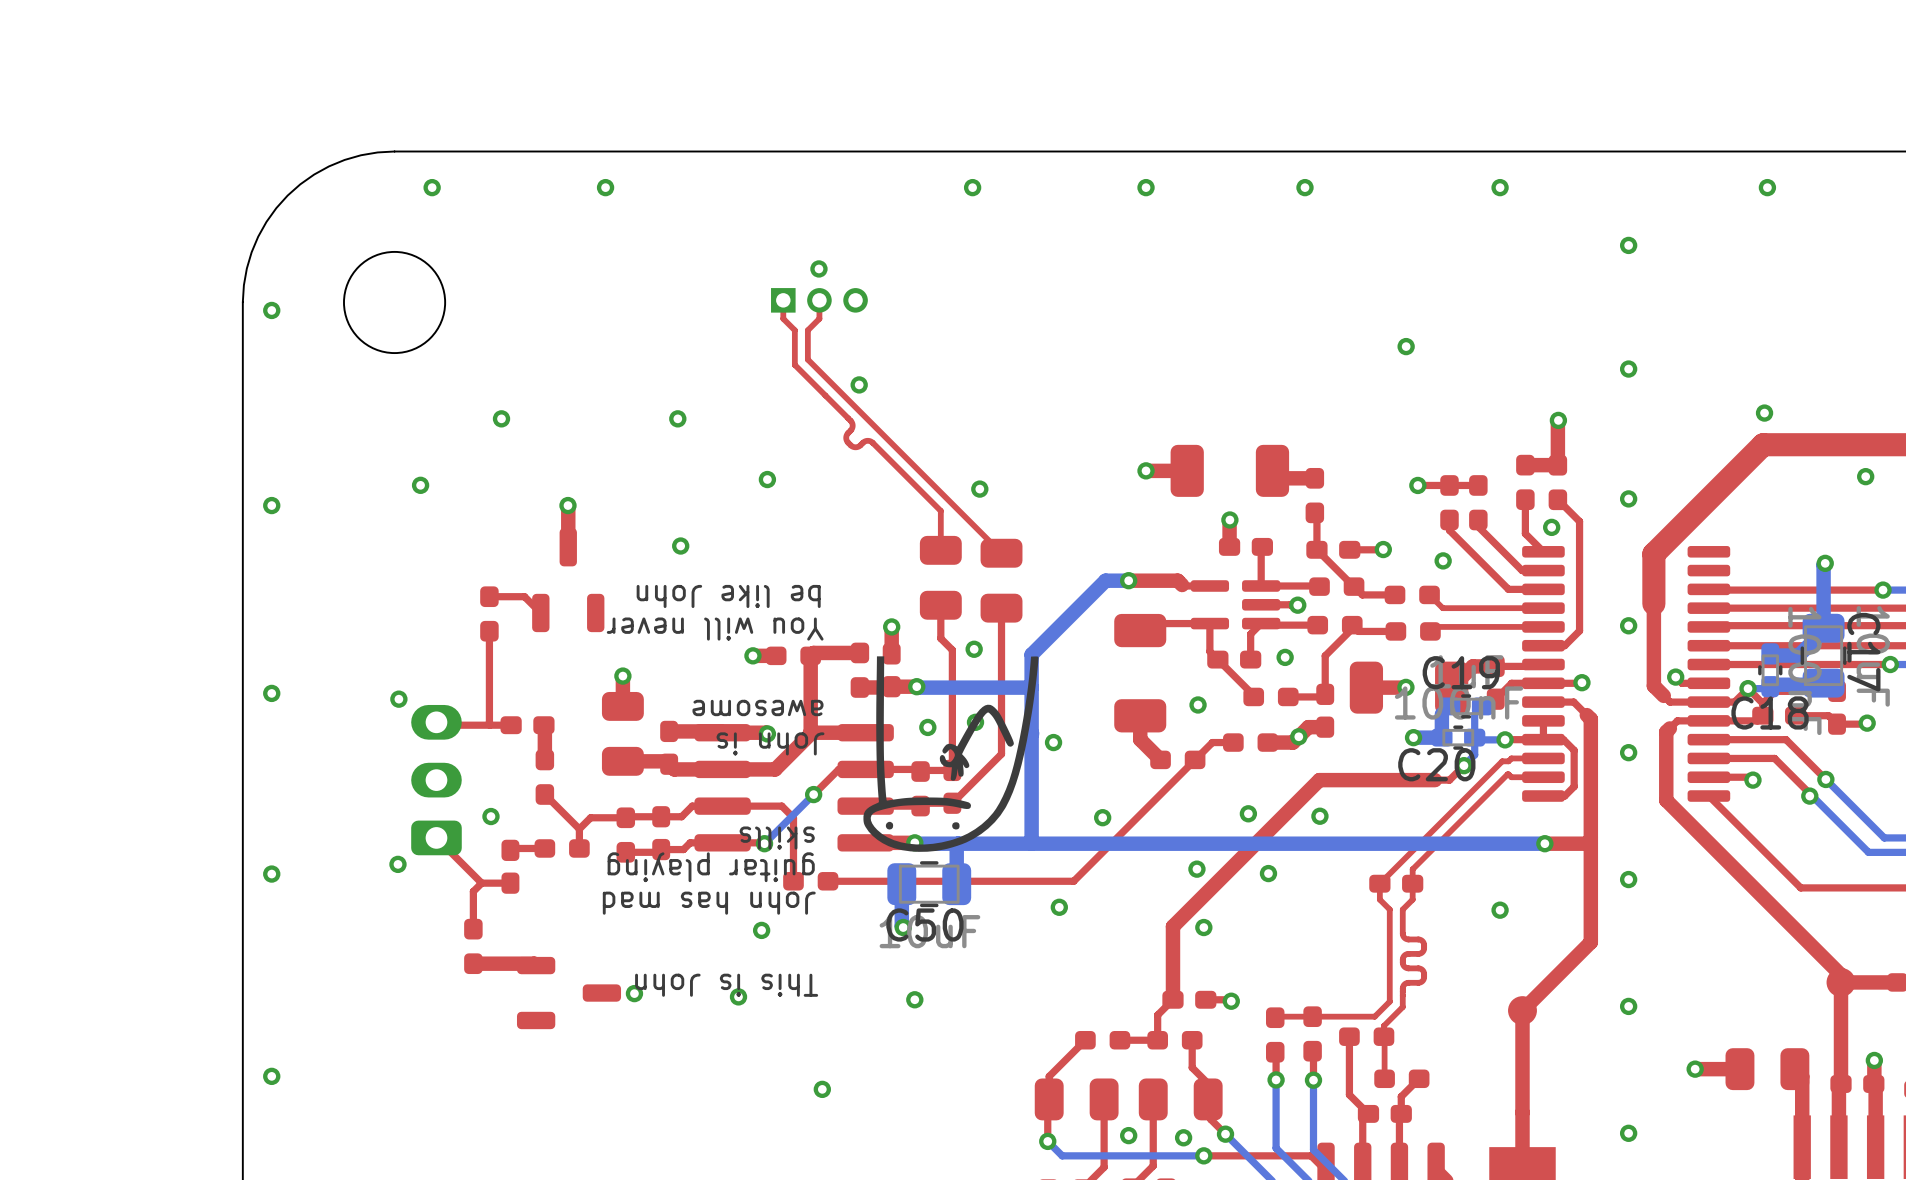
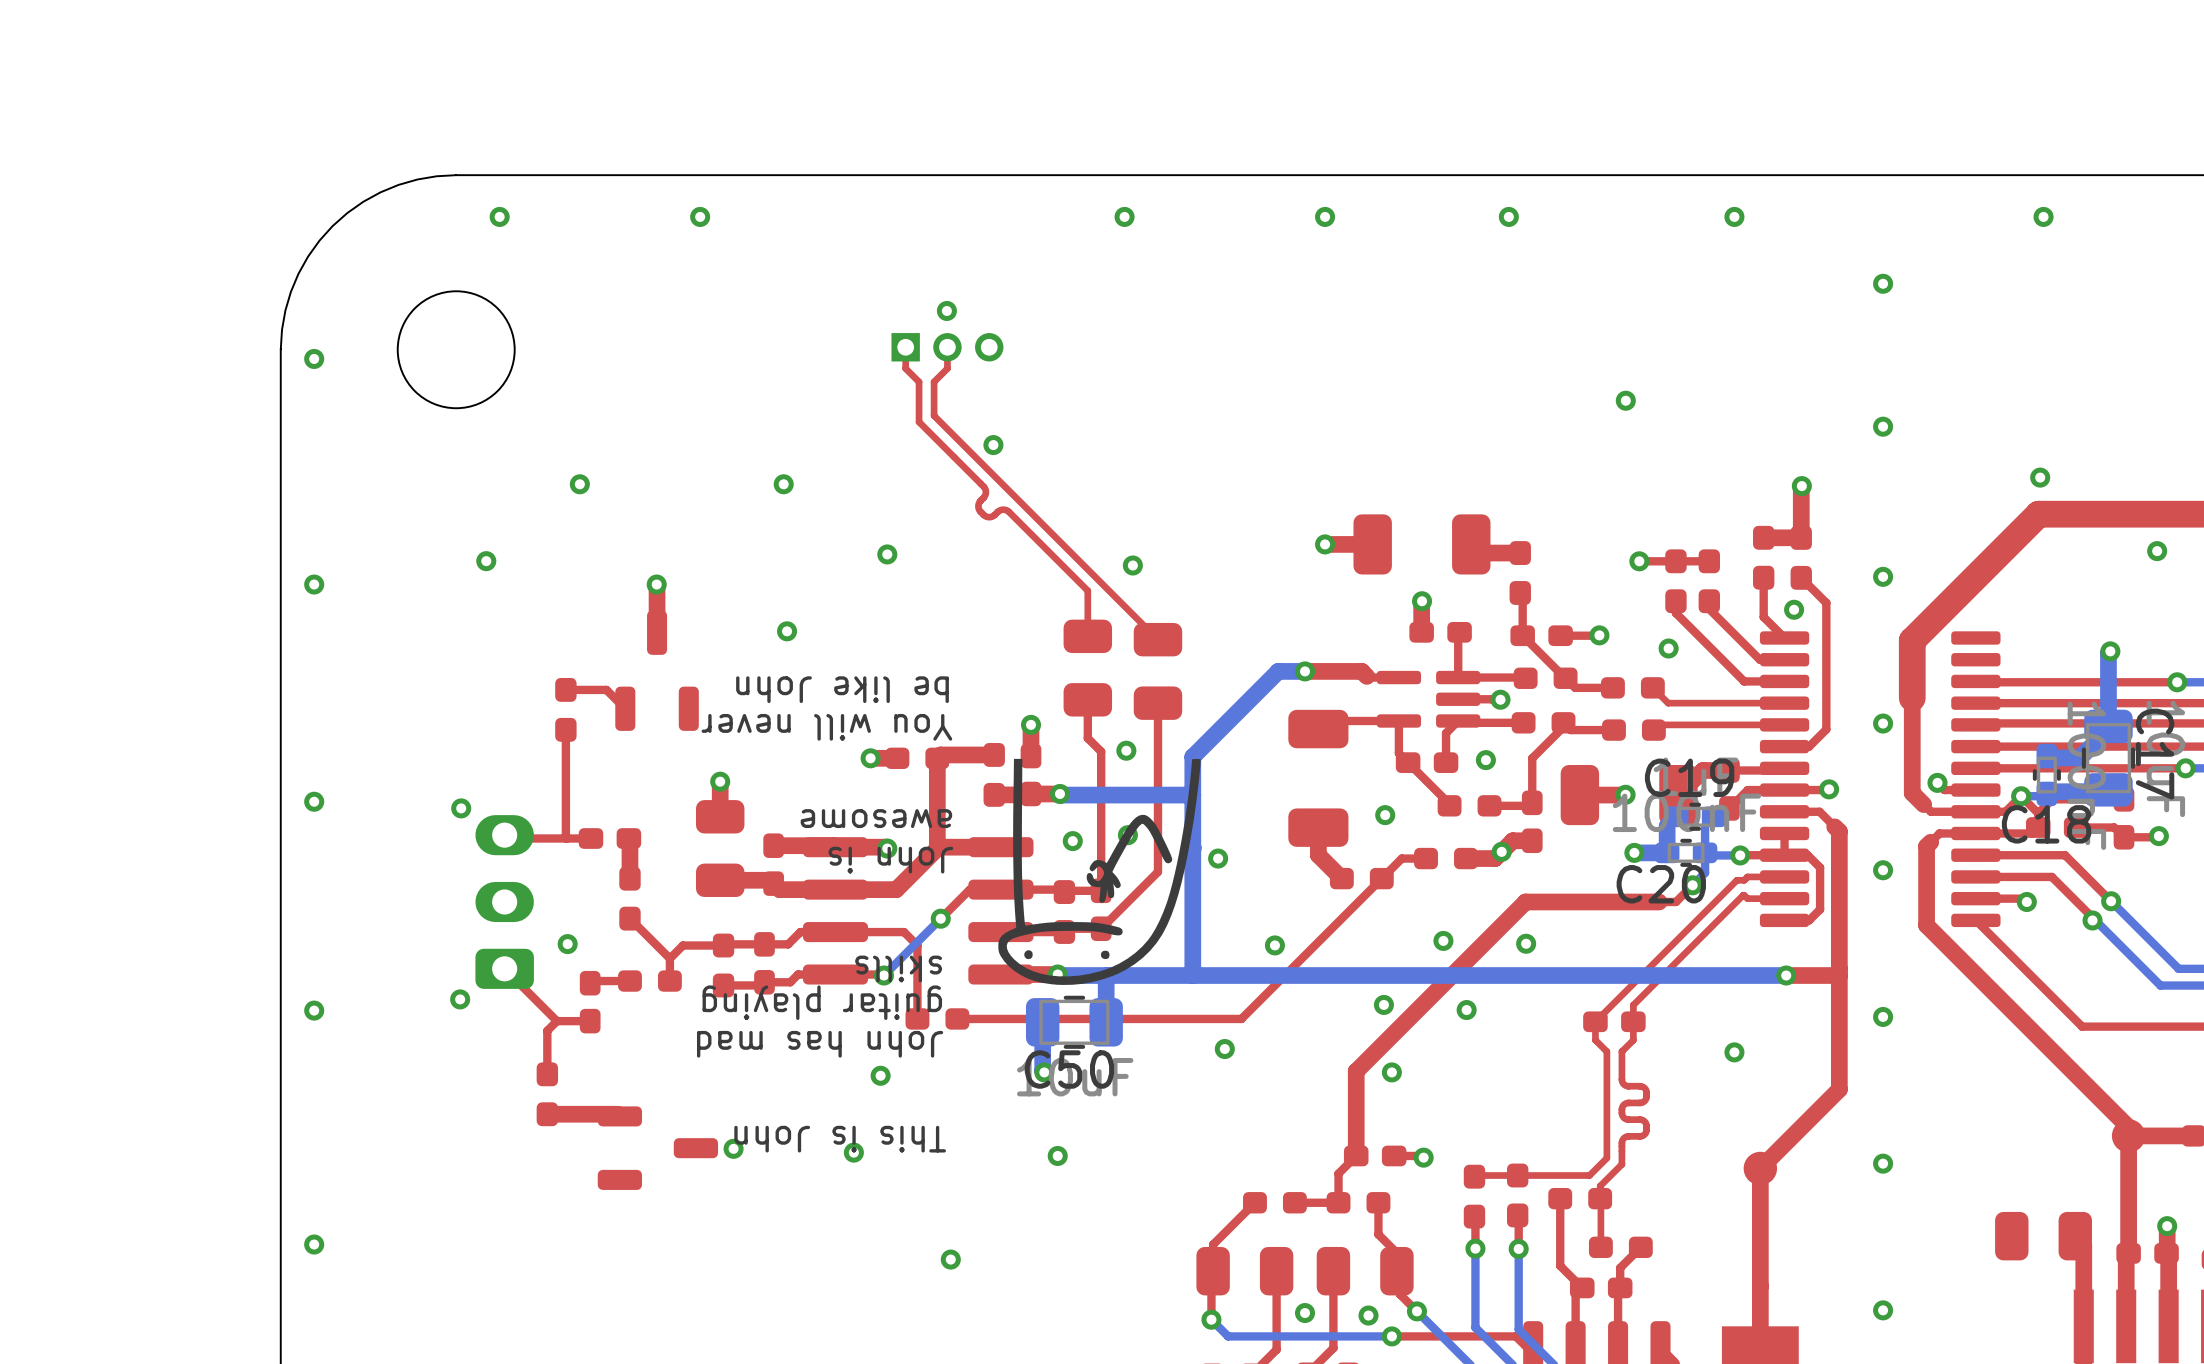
via: (1695, 1069) -> none
top track: (1739, 1069) (1695, 1069) -> none

